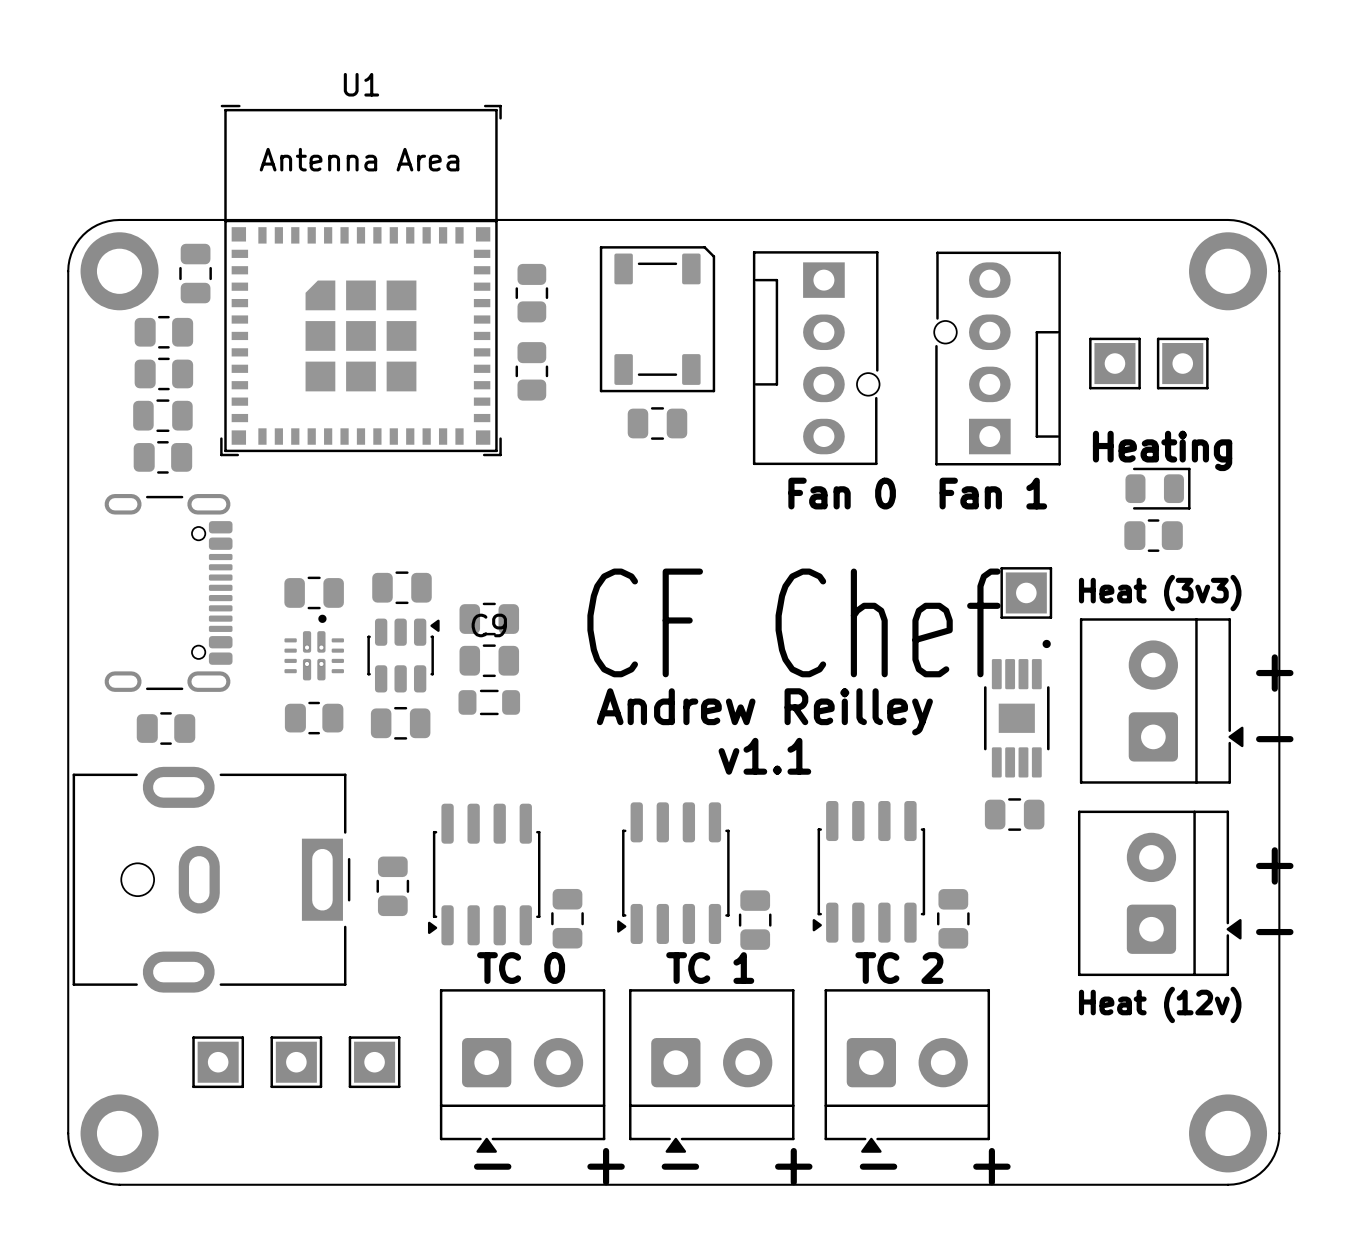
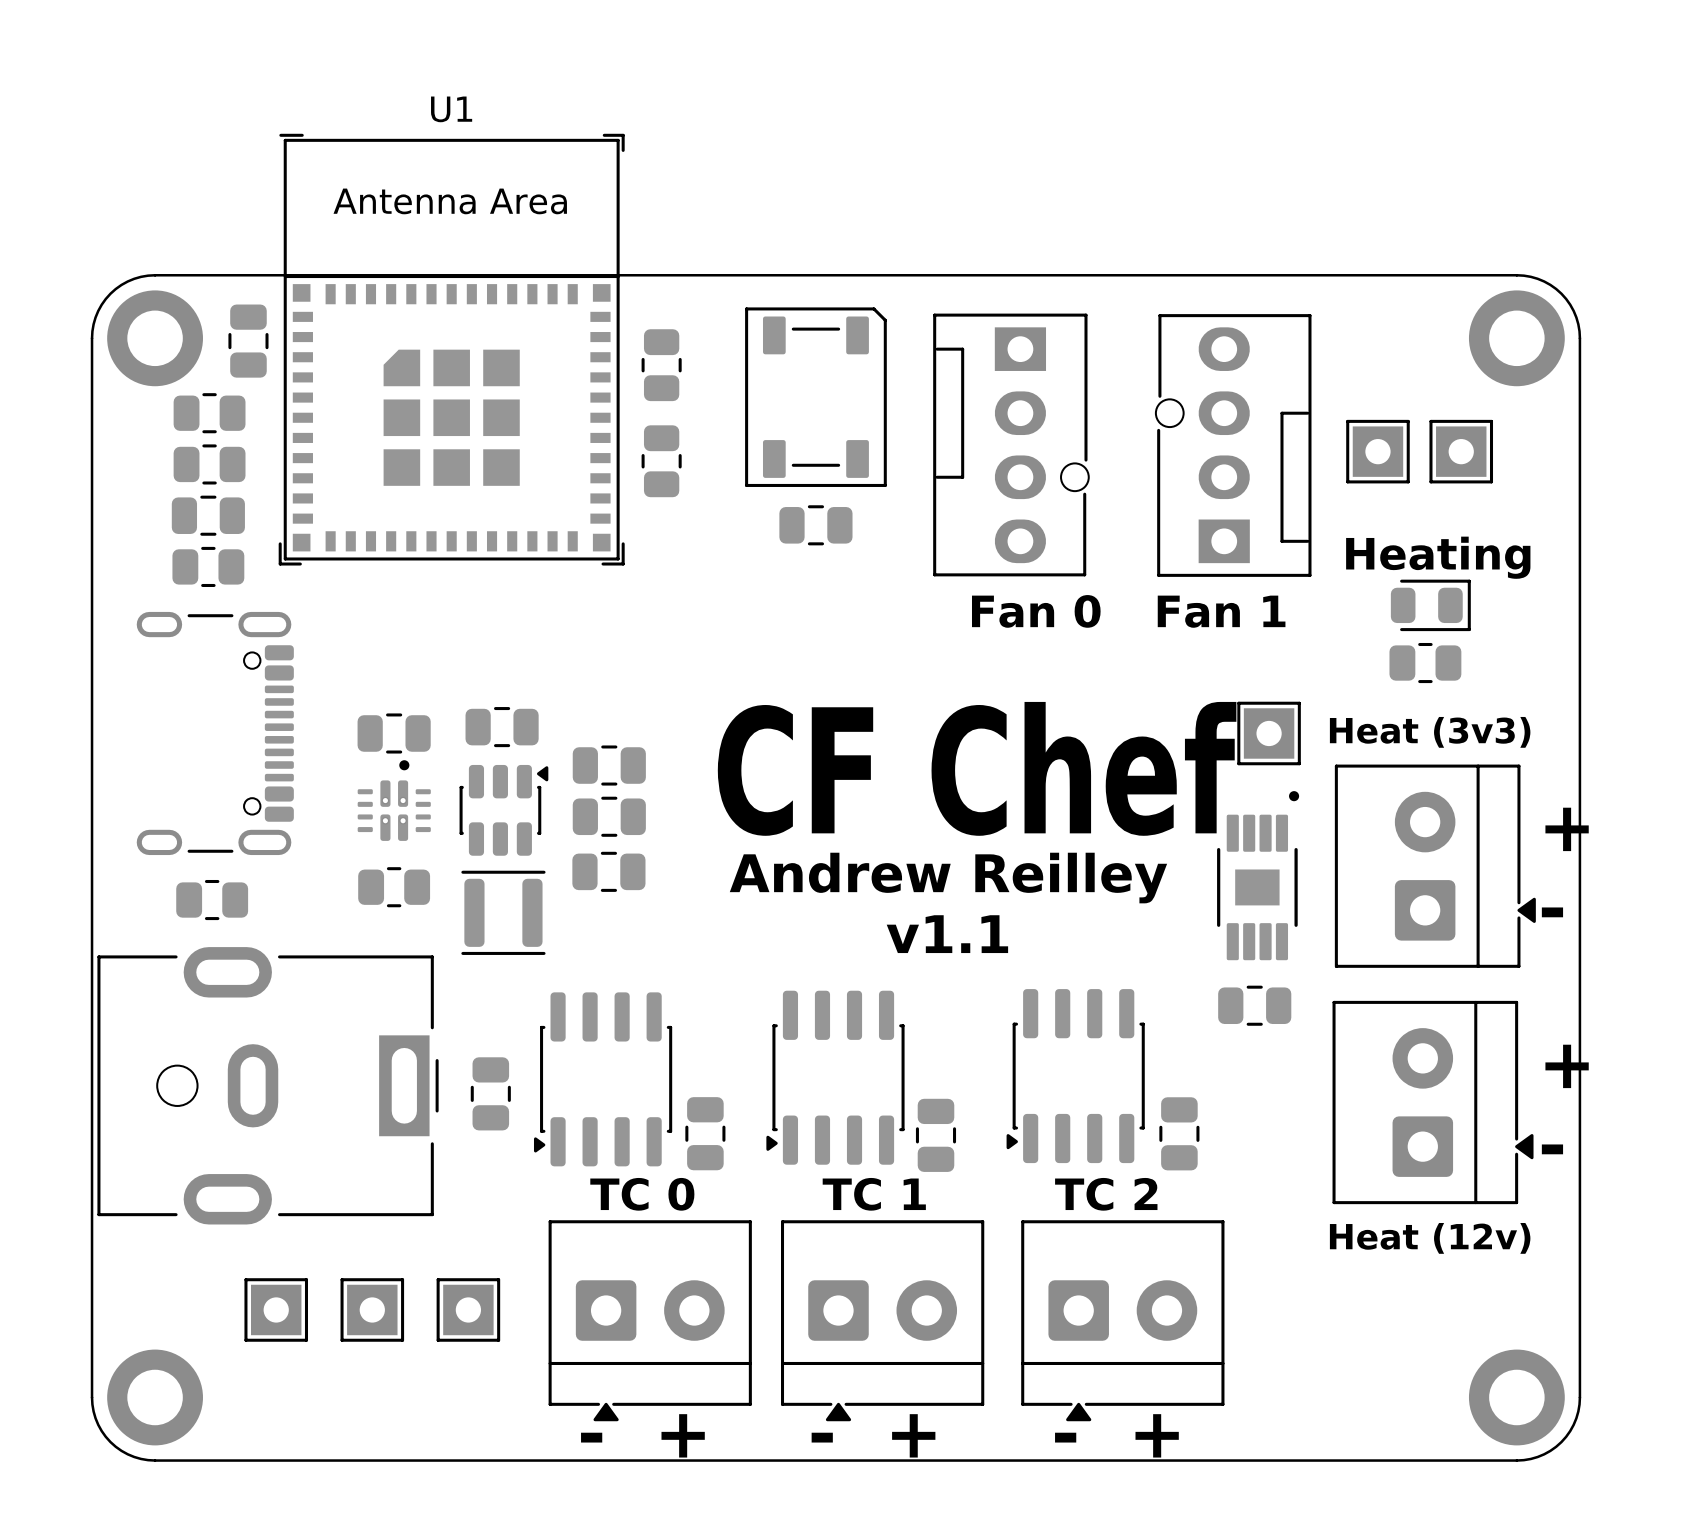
C9 name: C9 (489, 625) -> none
part footprint: [458, 689, 521, 716] -> [572, 851, 646, 892]
part footprint: [370, 706, 431, 740] -> [461, 870, 546, 955]

